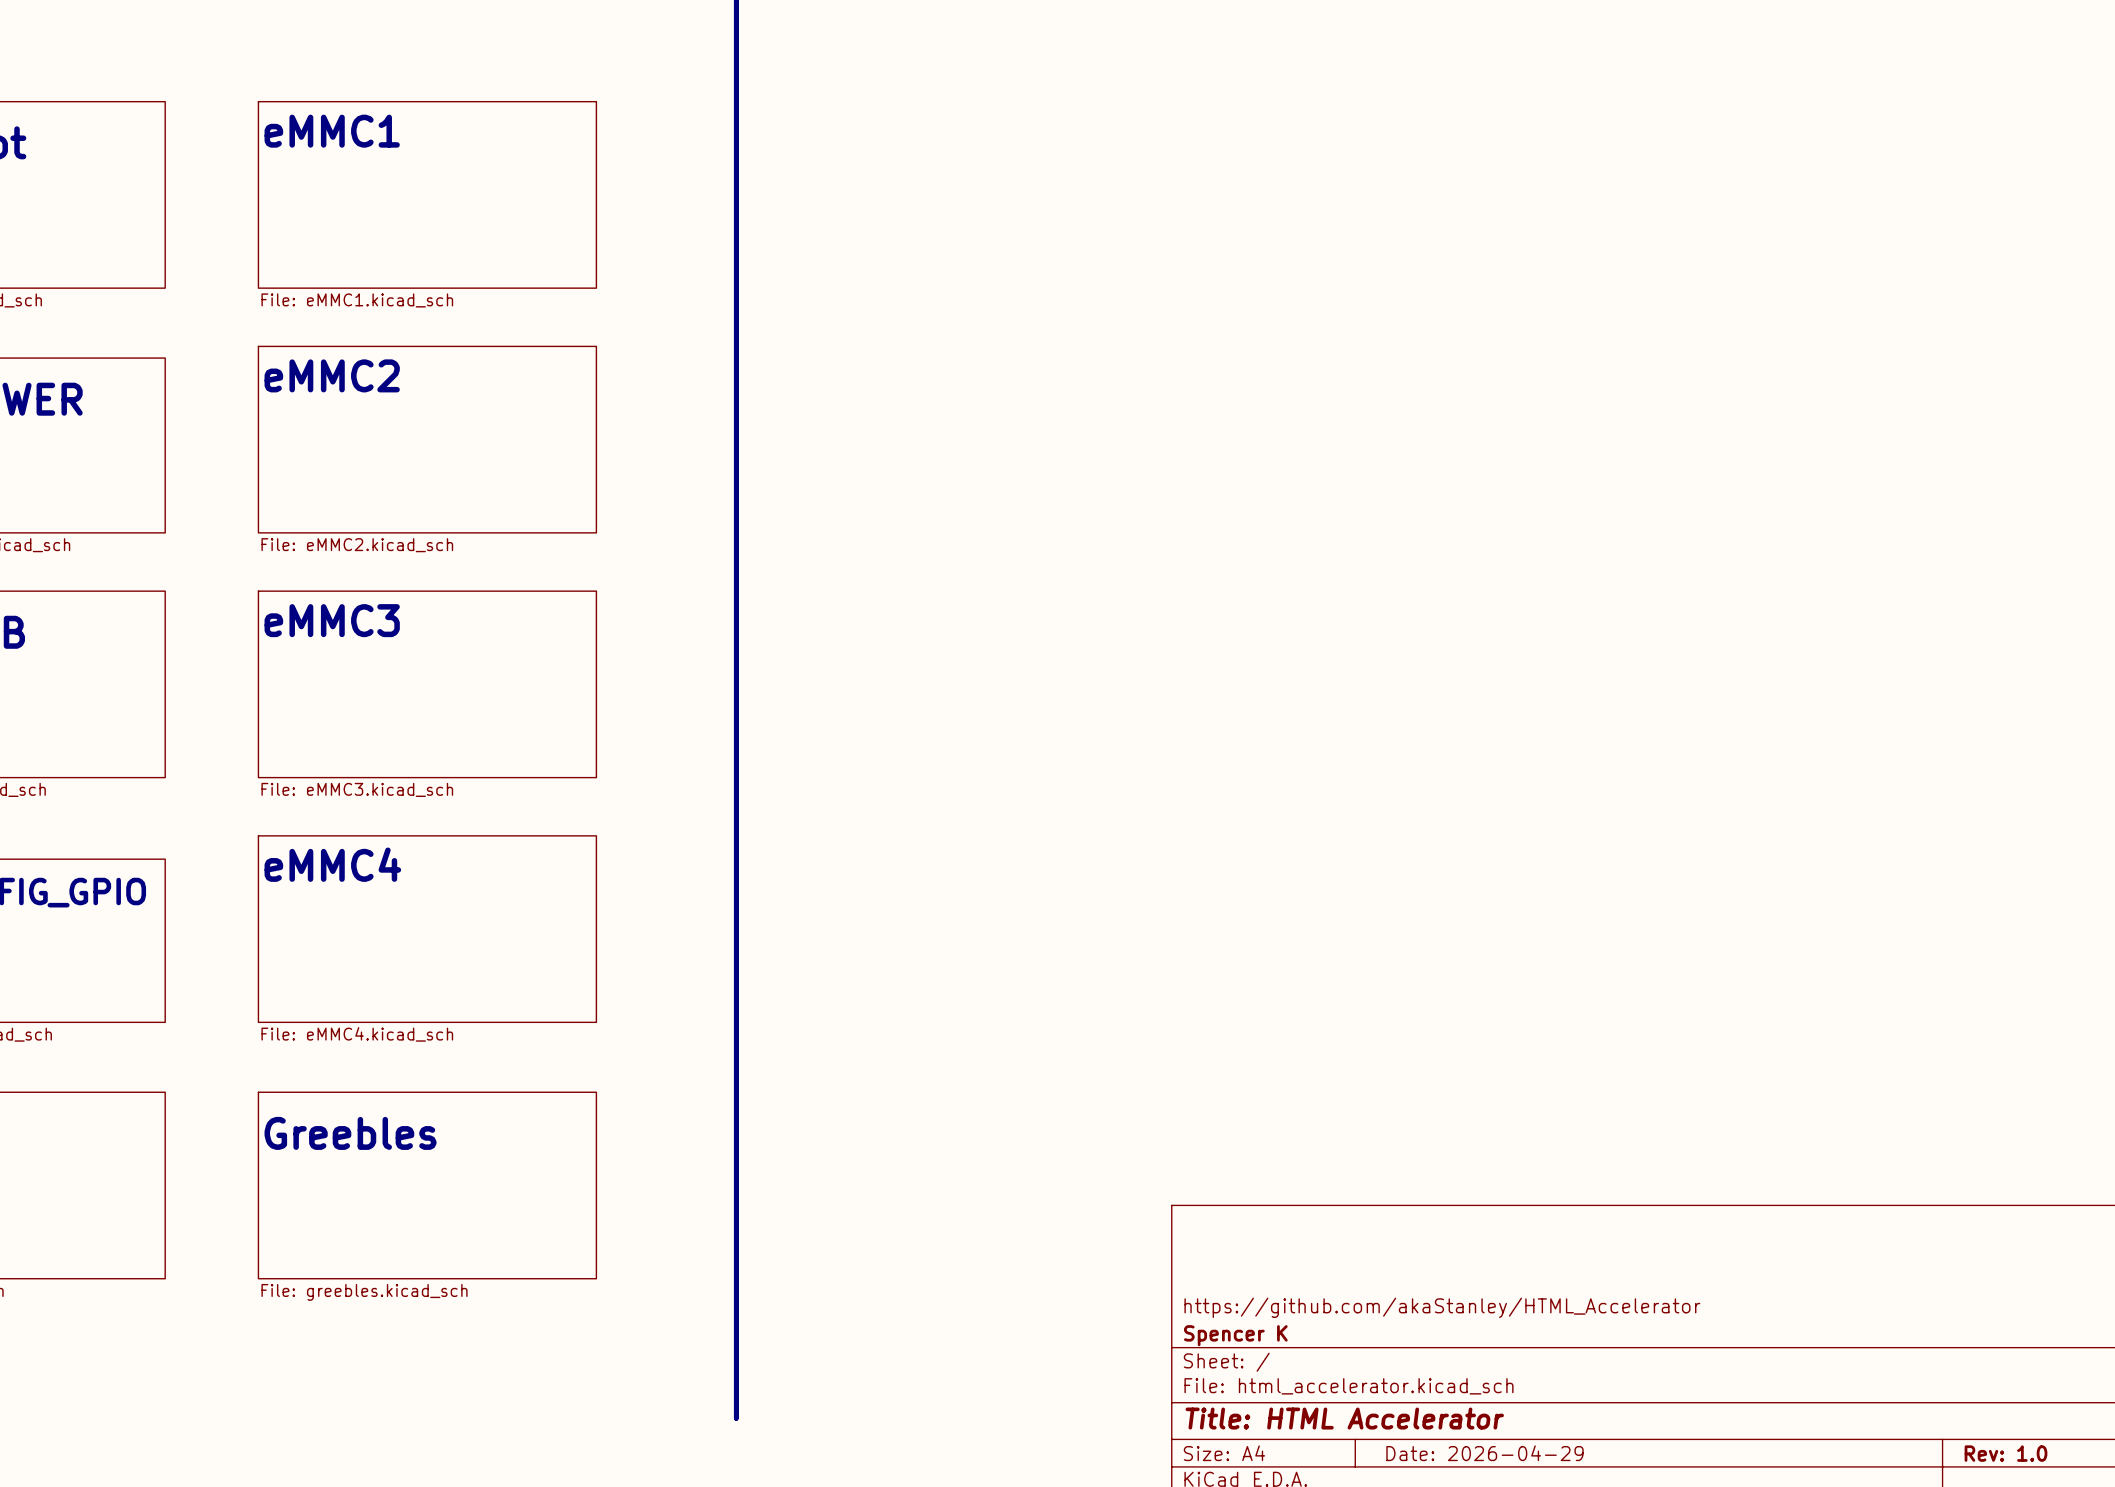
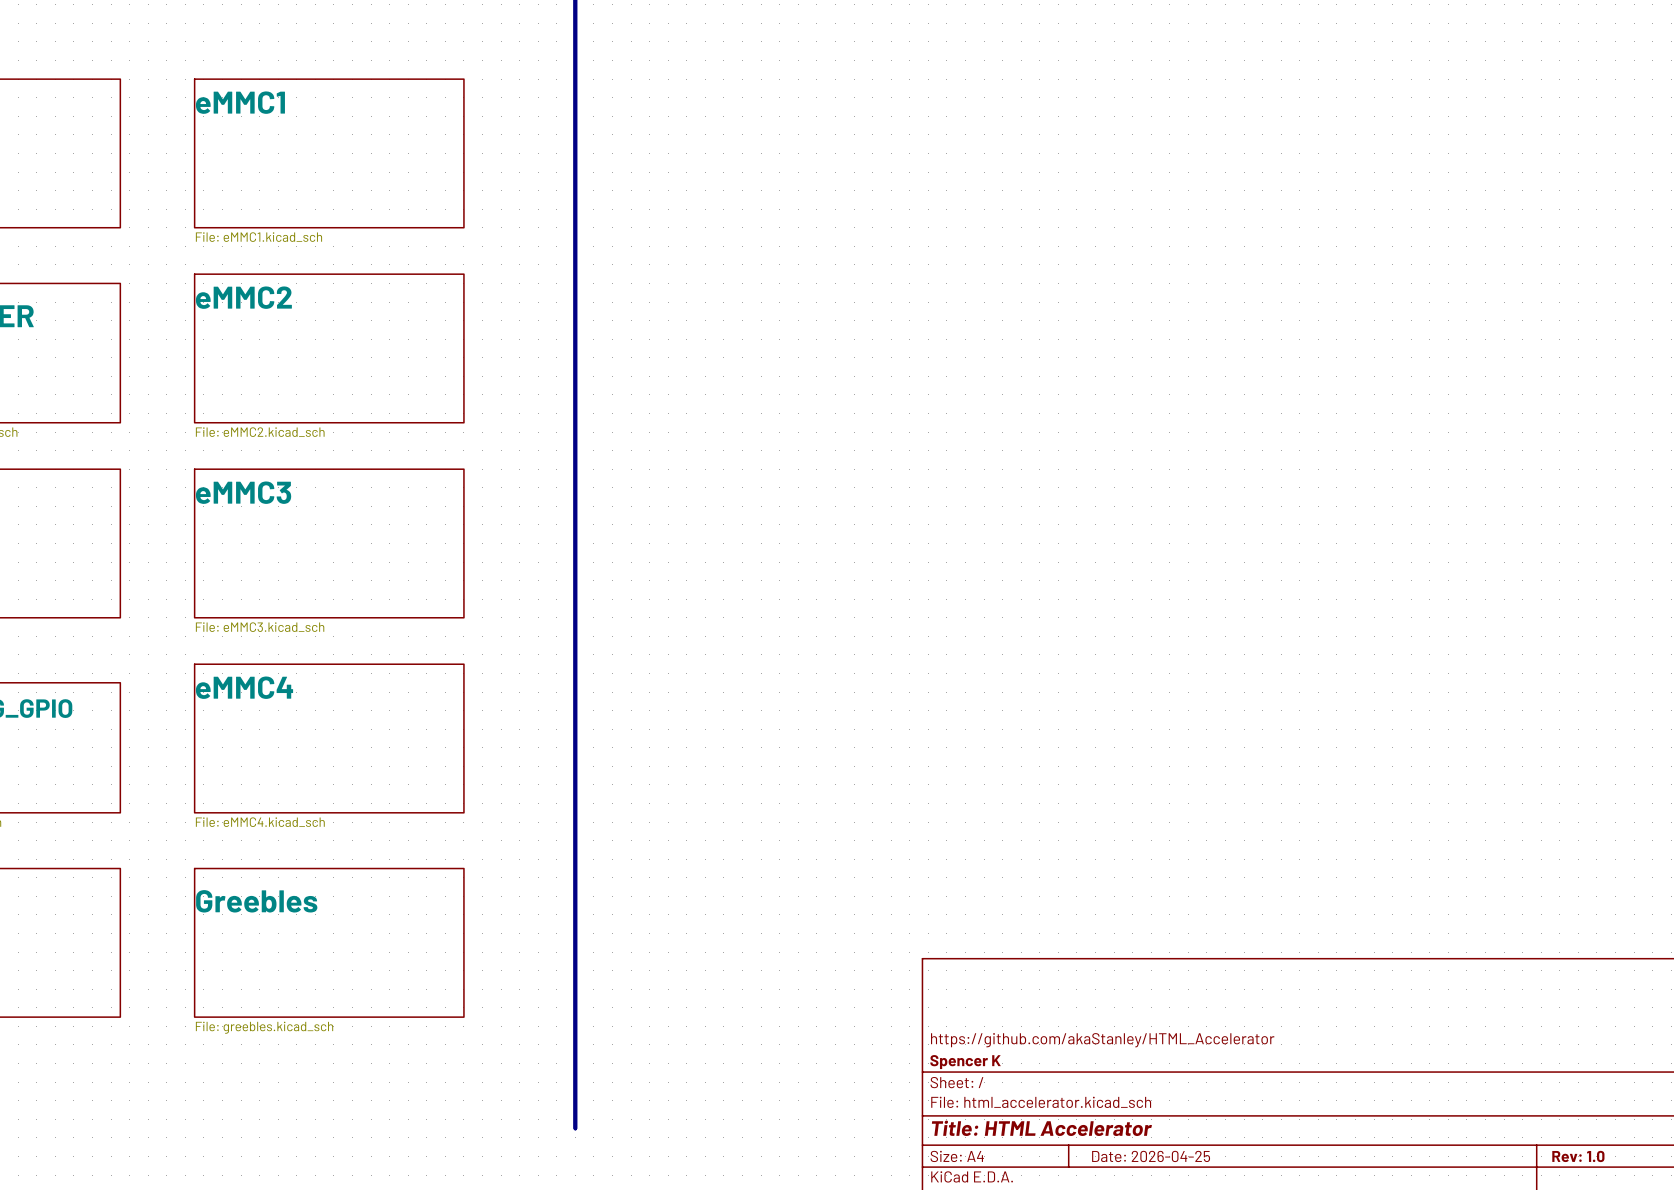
title block: Date: 2026-04-29 (1484, 1453) -> Date: 2026-04-25 (1151, 1156)

